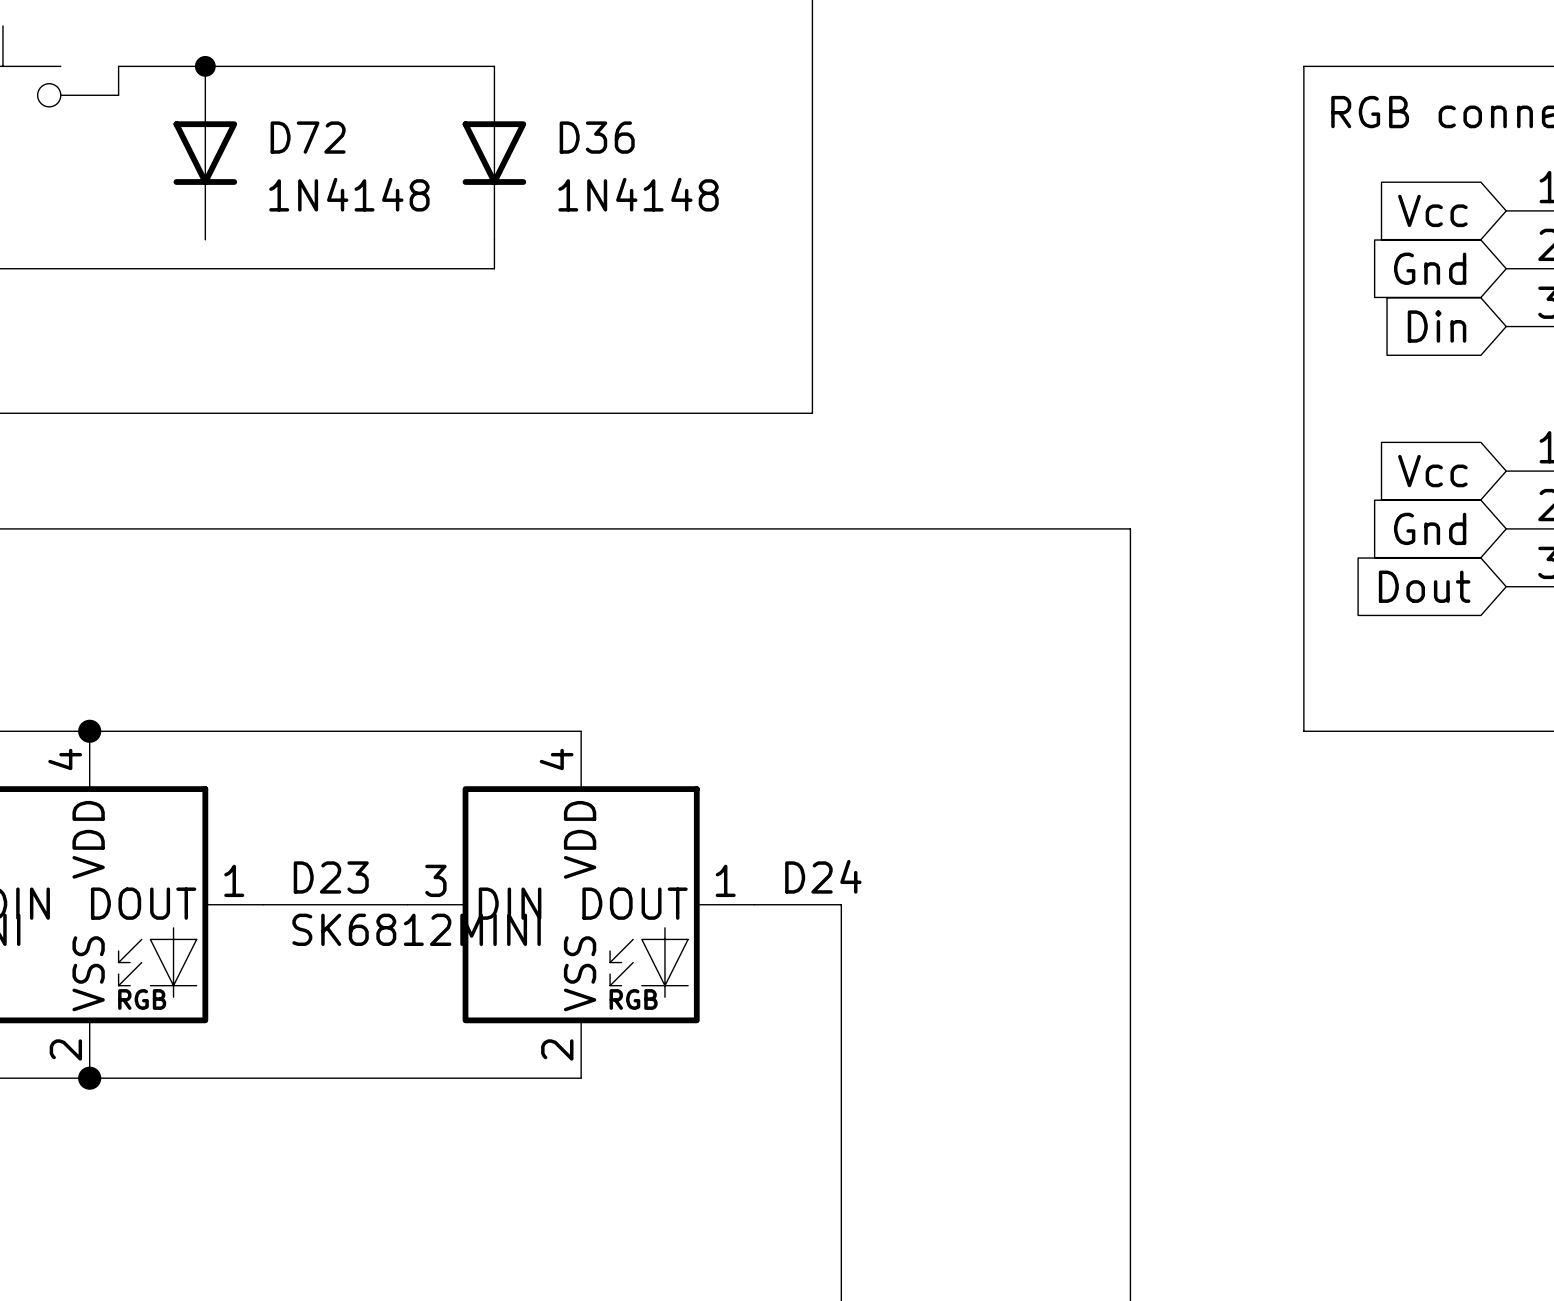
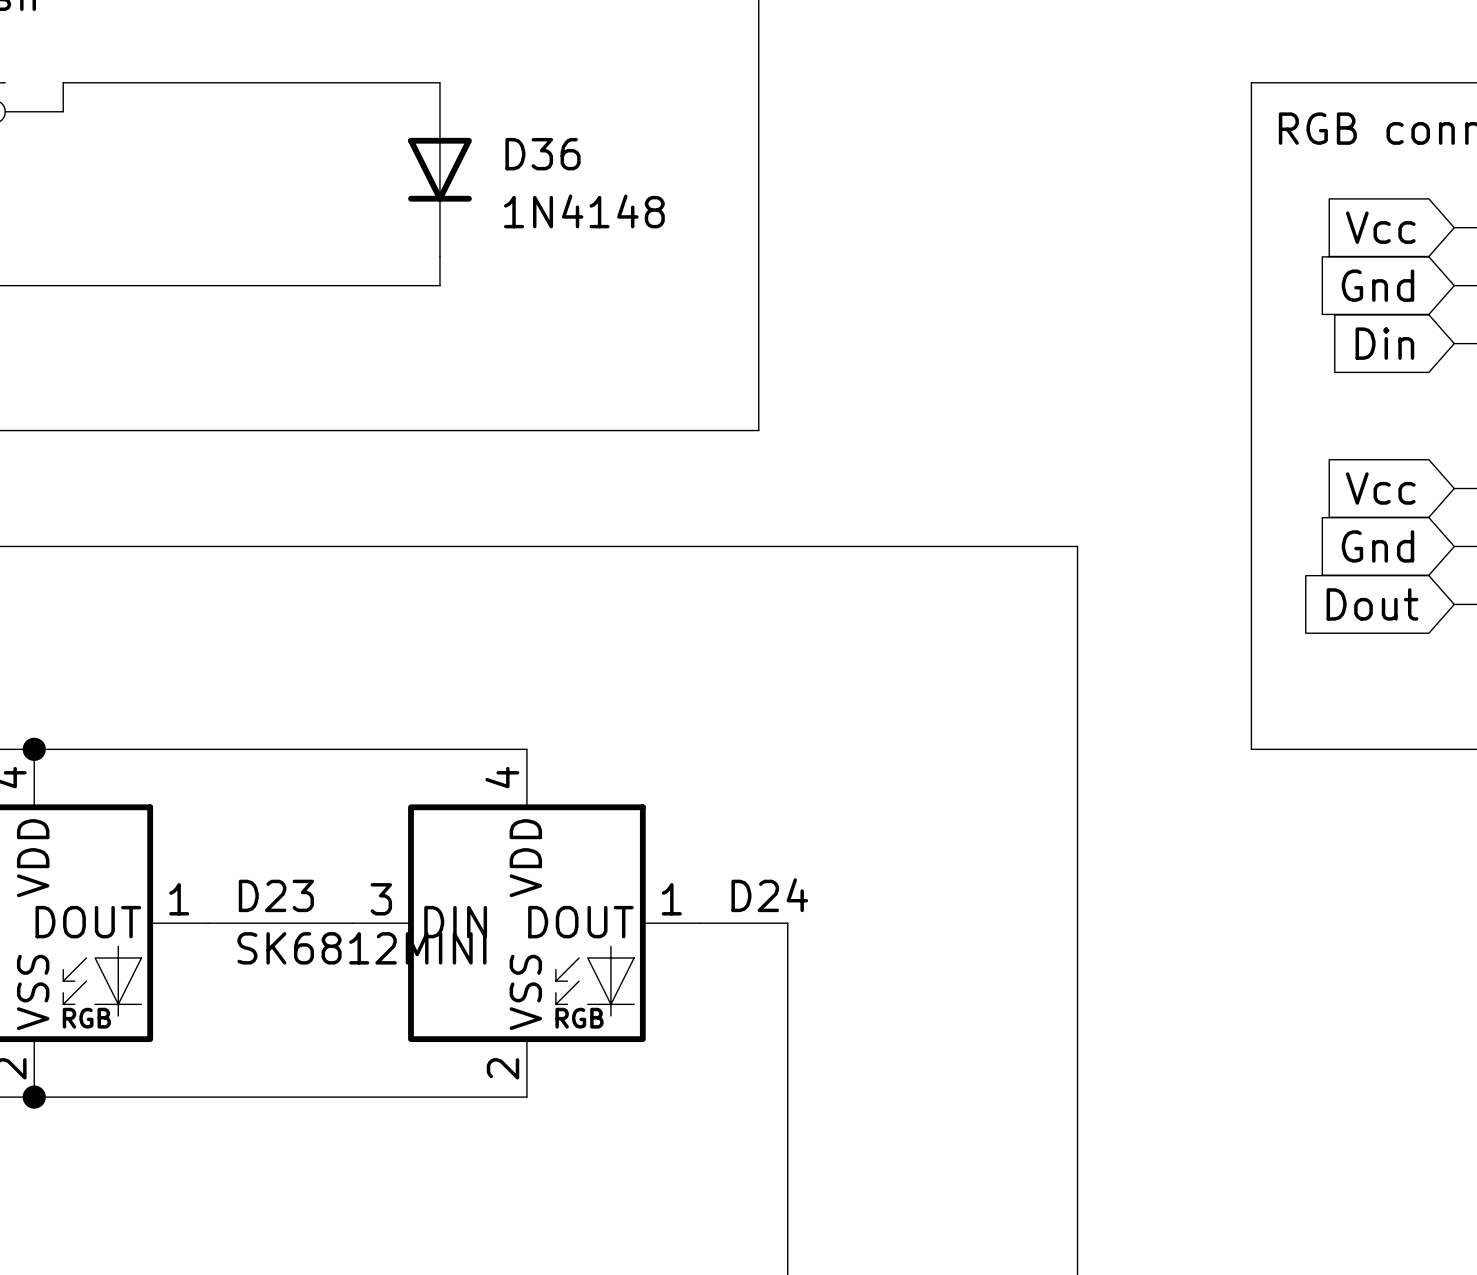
junction: (205, 66) -> none
D72: 1N4148 (205, 153) -> none

